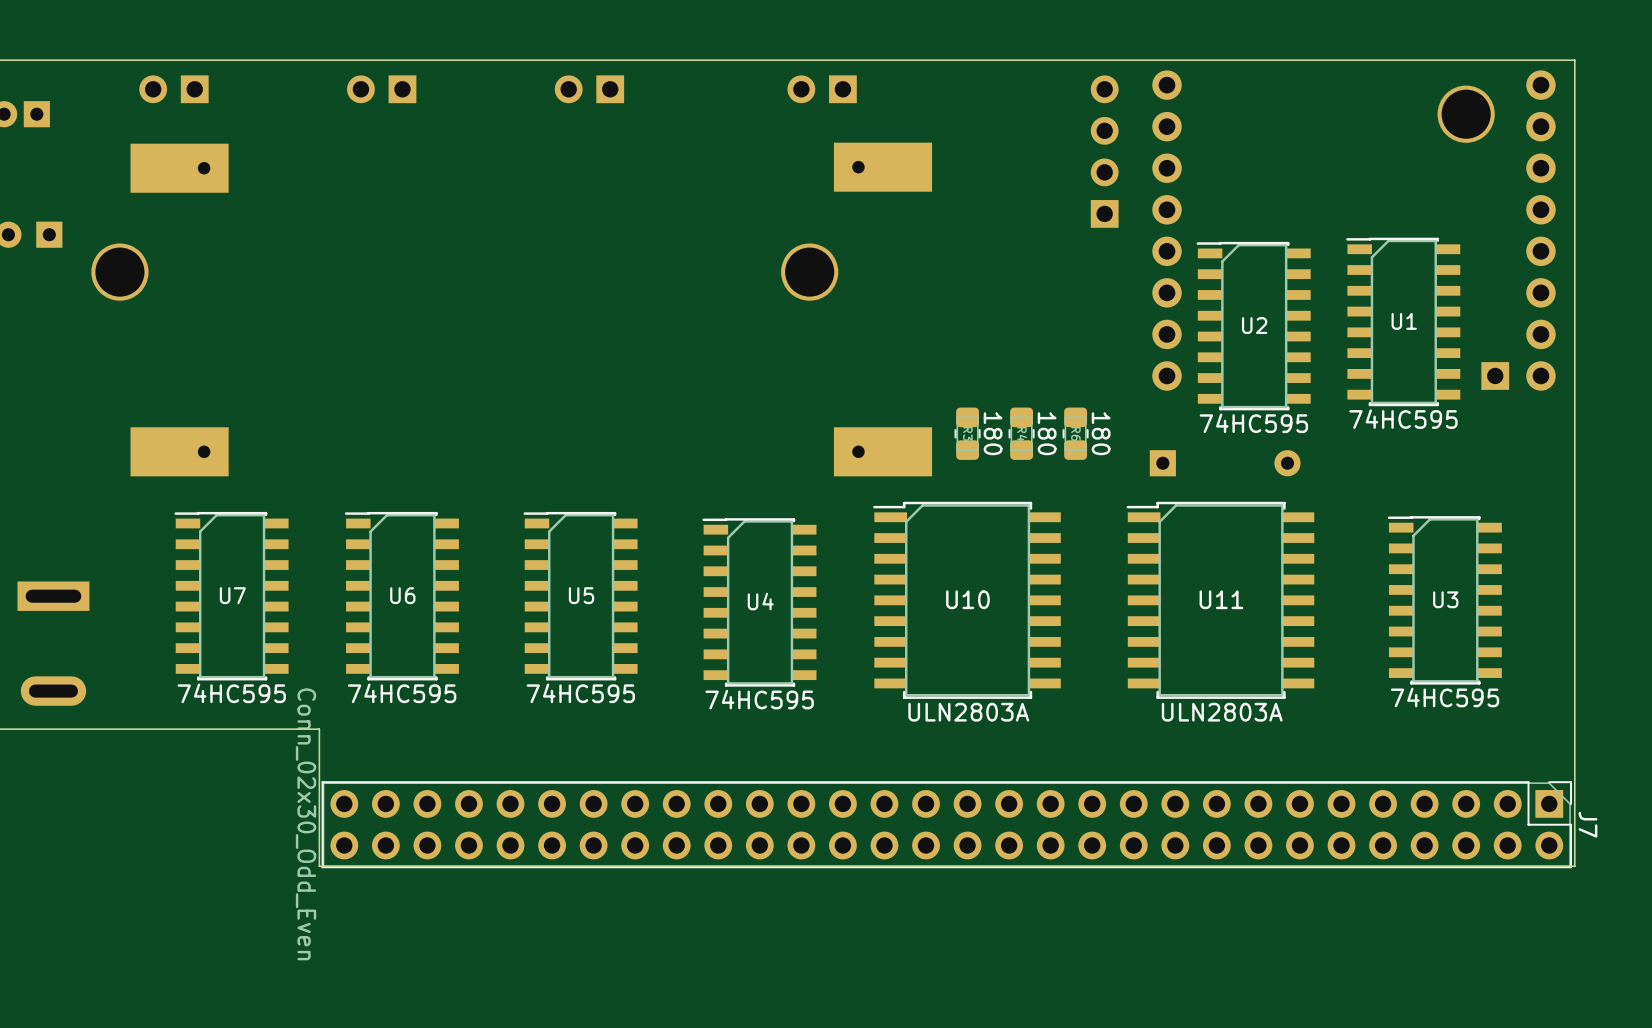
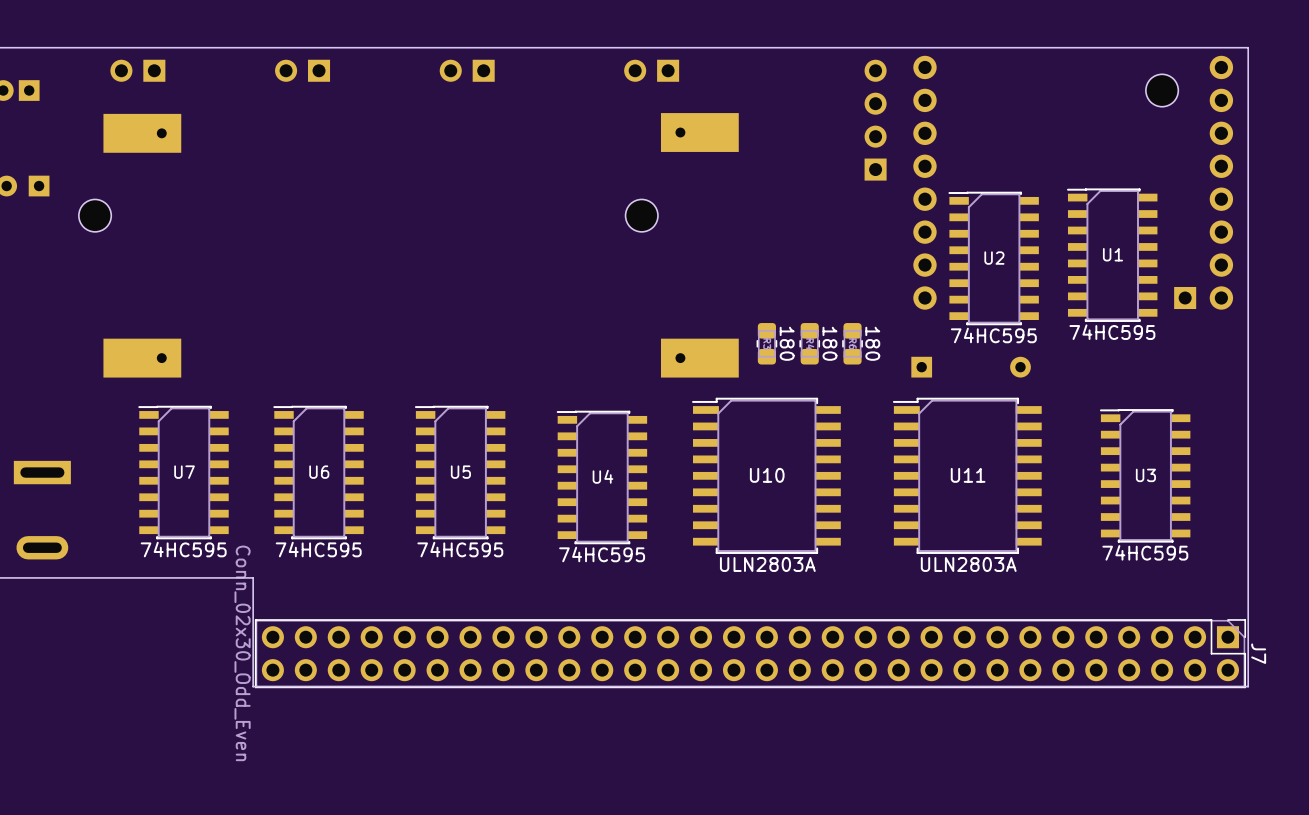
part footprint: [1437, 85, 1495, 143] -> [1145, 74, 1179, 107]
part footprint: [91, 243, 149, 301] -> [78, 199, 112, 232]
part footprint: [781, 243, 839, 301] -> [625, 199, 658, 232]

